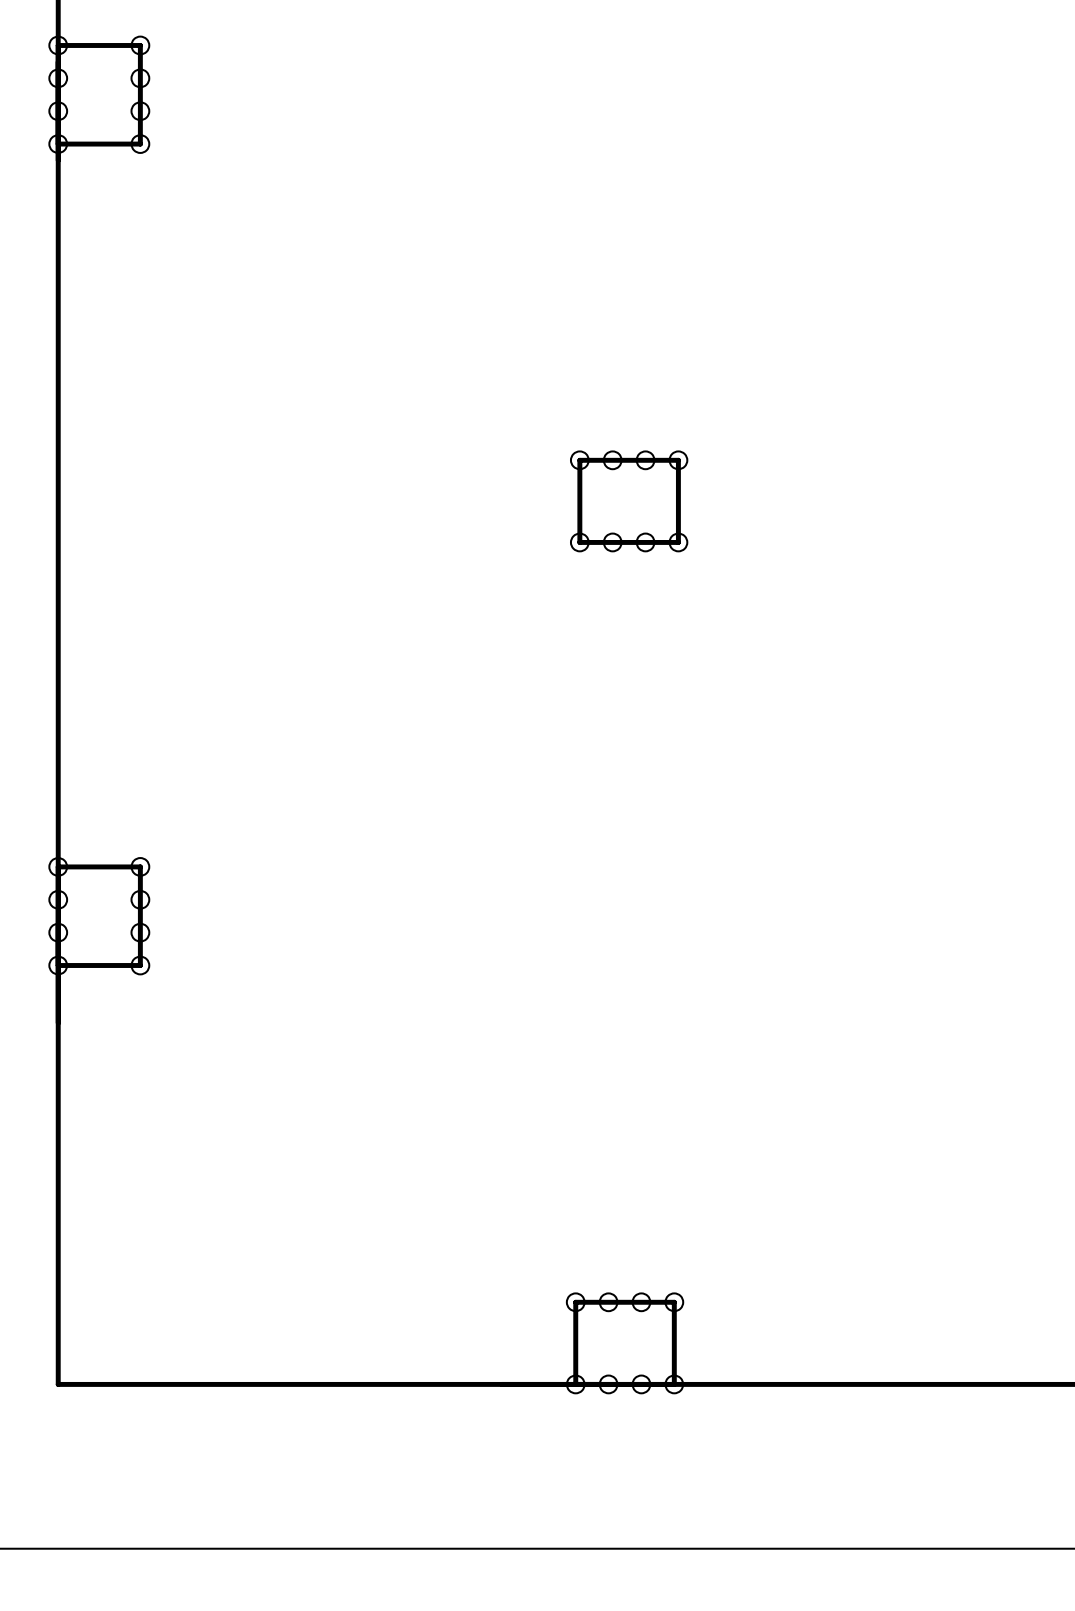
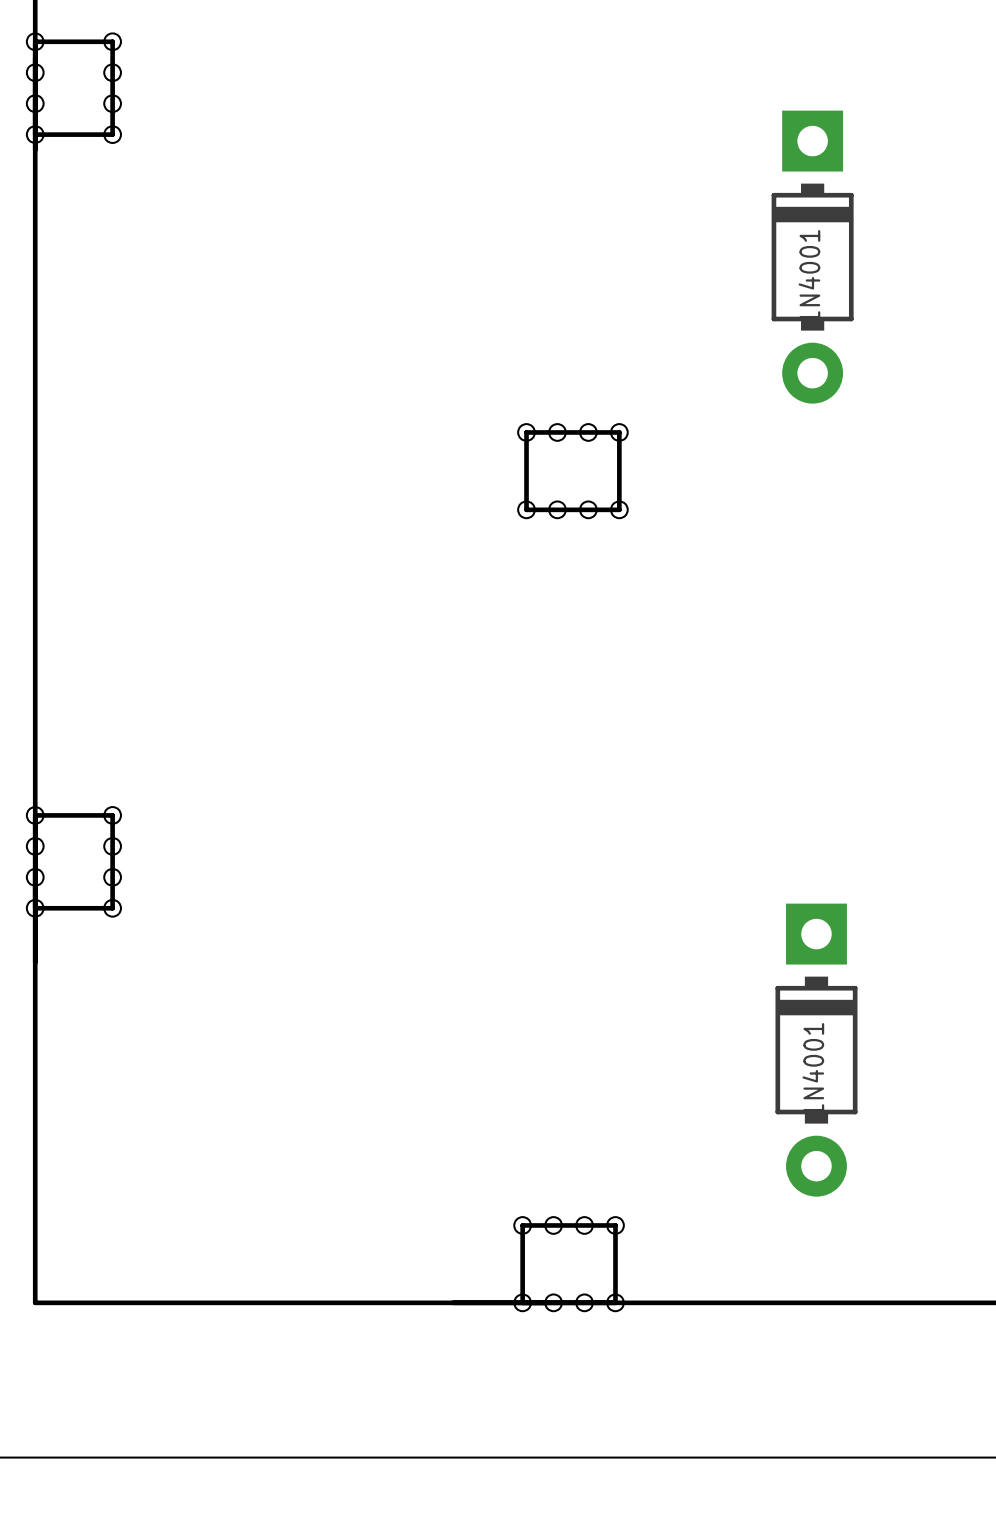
part: none -> 1N4001 (812, 257)
part: none -> 1N4001 (816, 1050)

